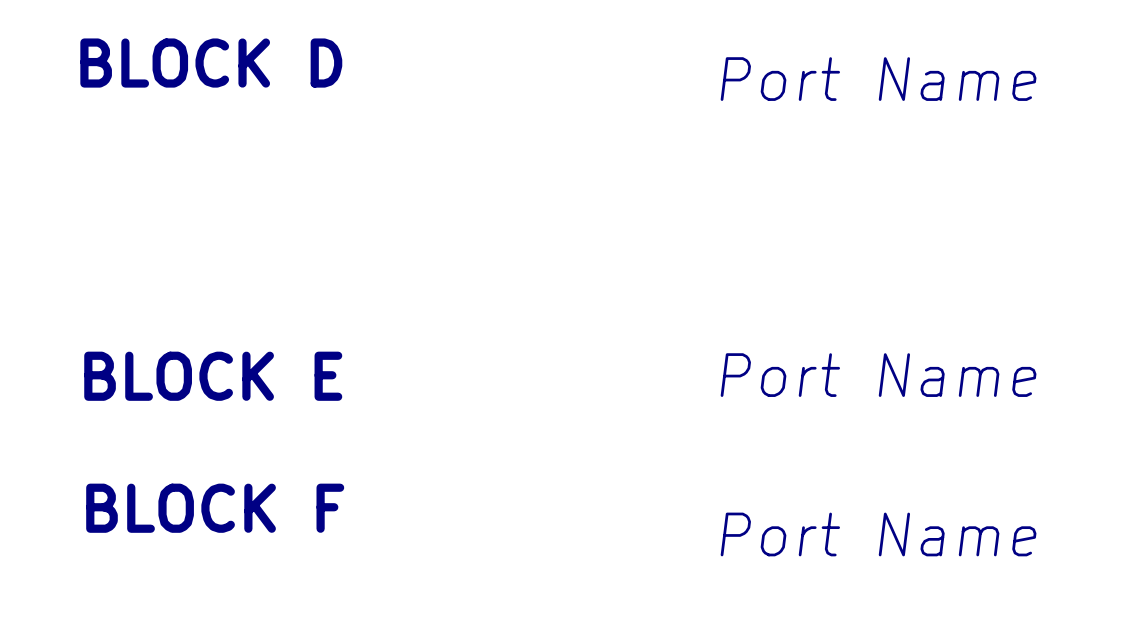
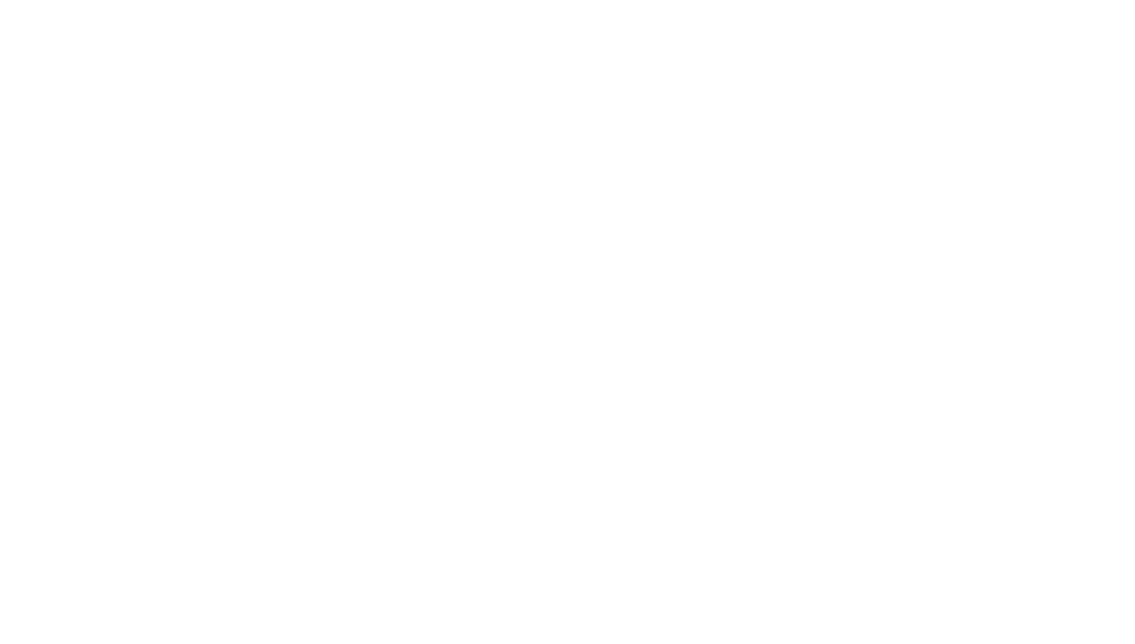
text: BLOCK D (211, 63) -> none
text: Port Name (878, 79) -> none
text: Port Name (878, 375) -> none
text: BLOCK E (213, 376) -> none
text: BLOCK F (215, 508) -> none
text: Port Name (878, 534) -> none

